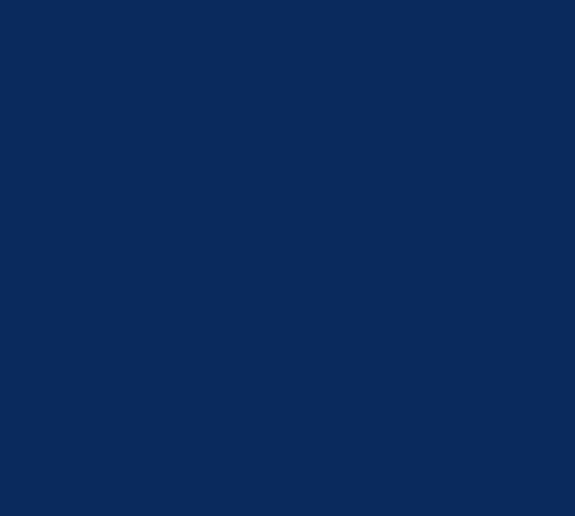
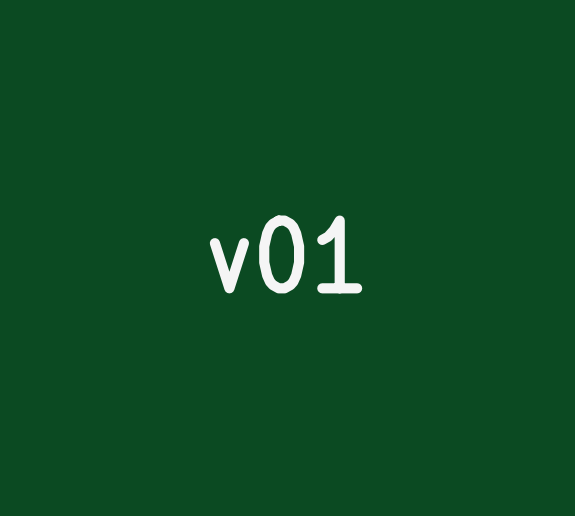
text: none -> v01 (286, 254)

